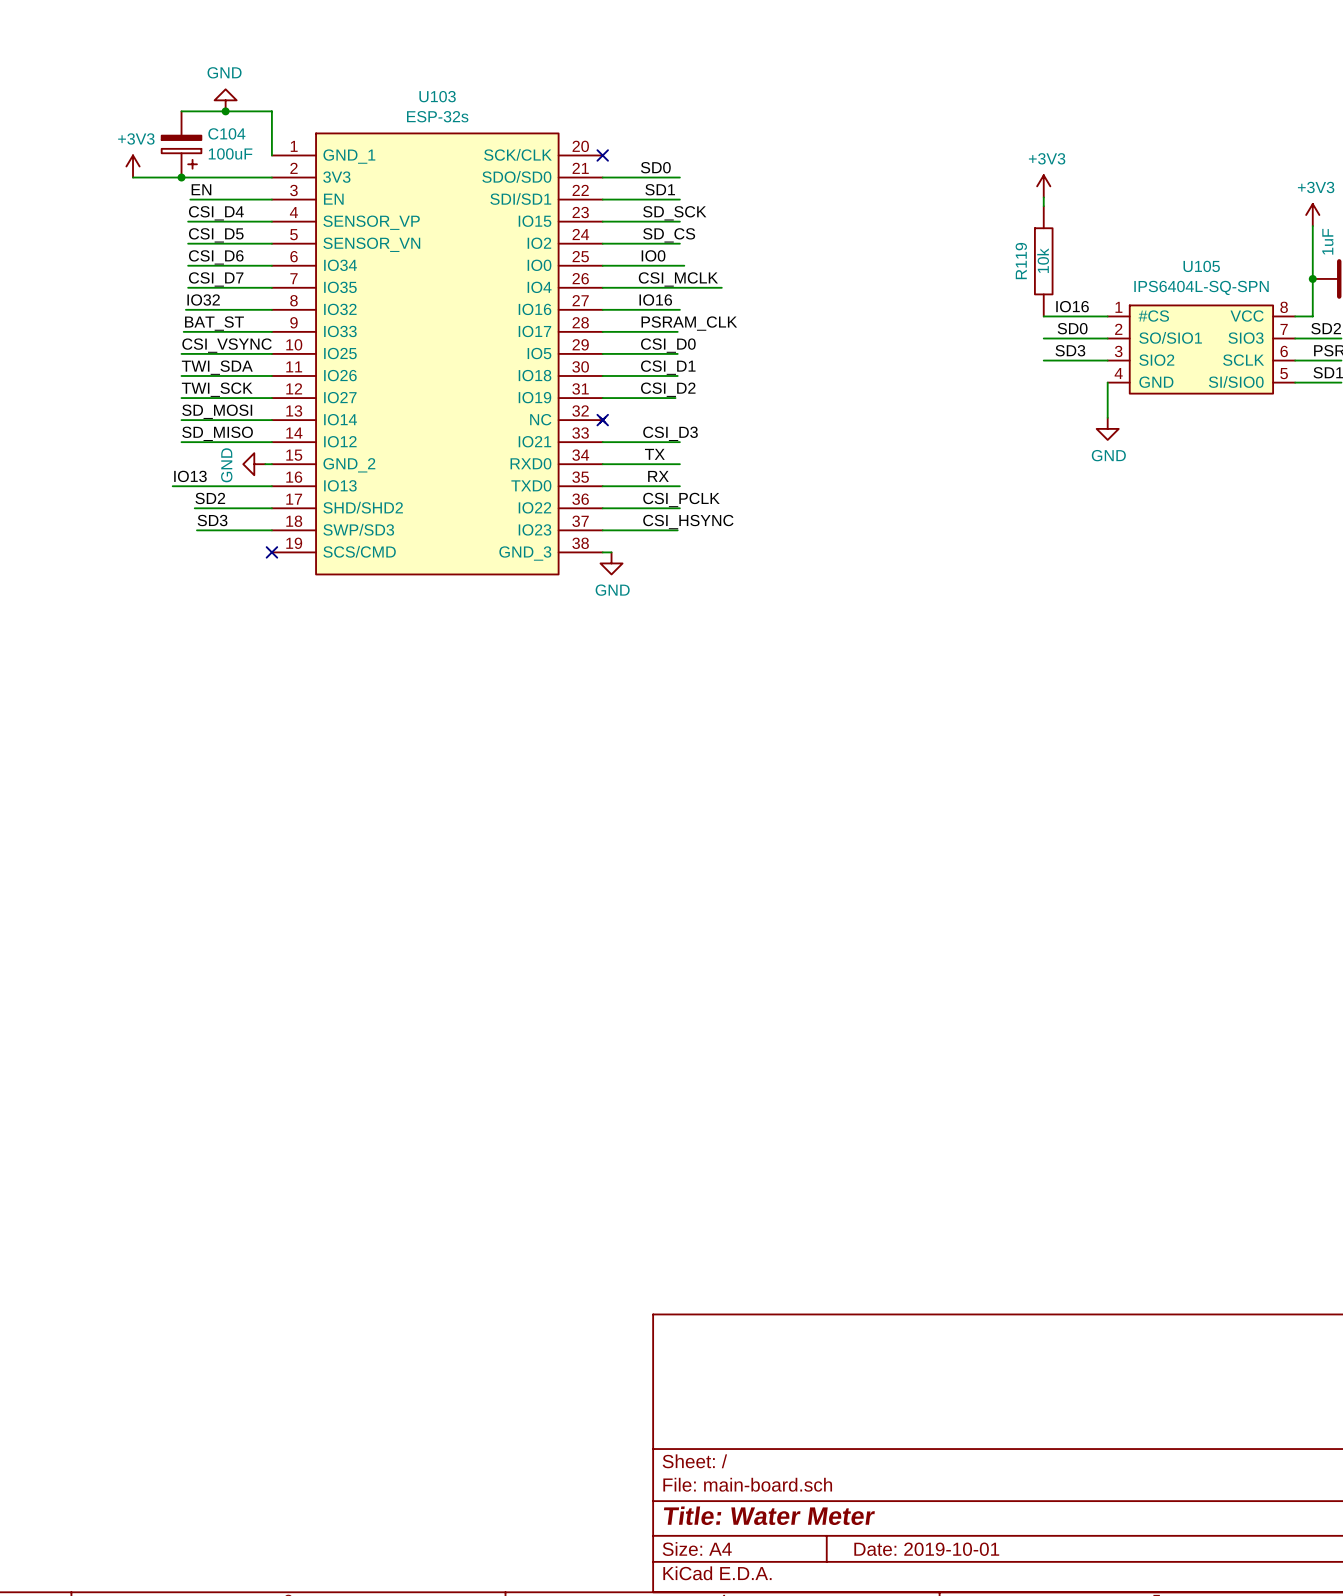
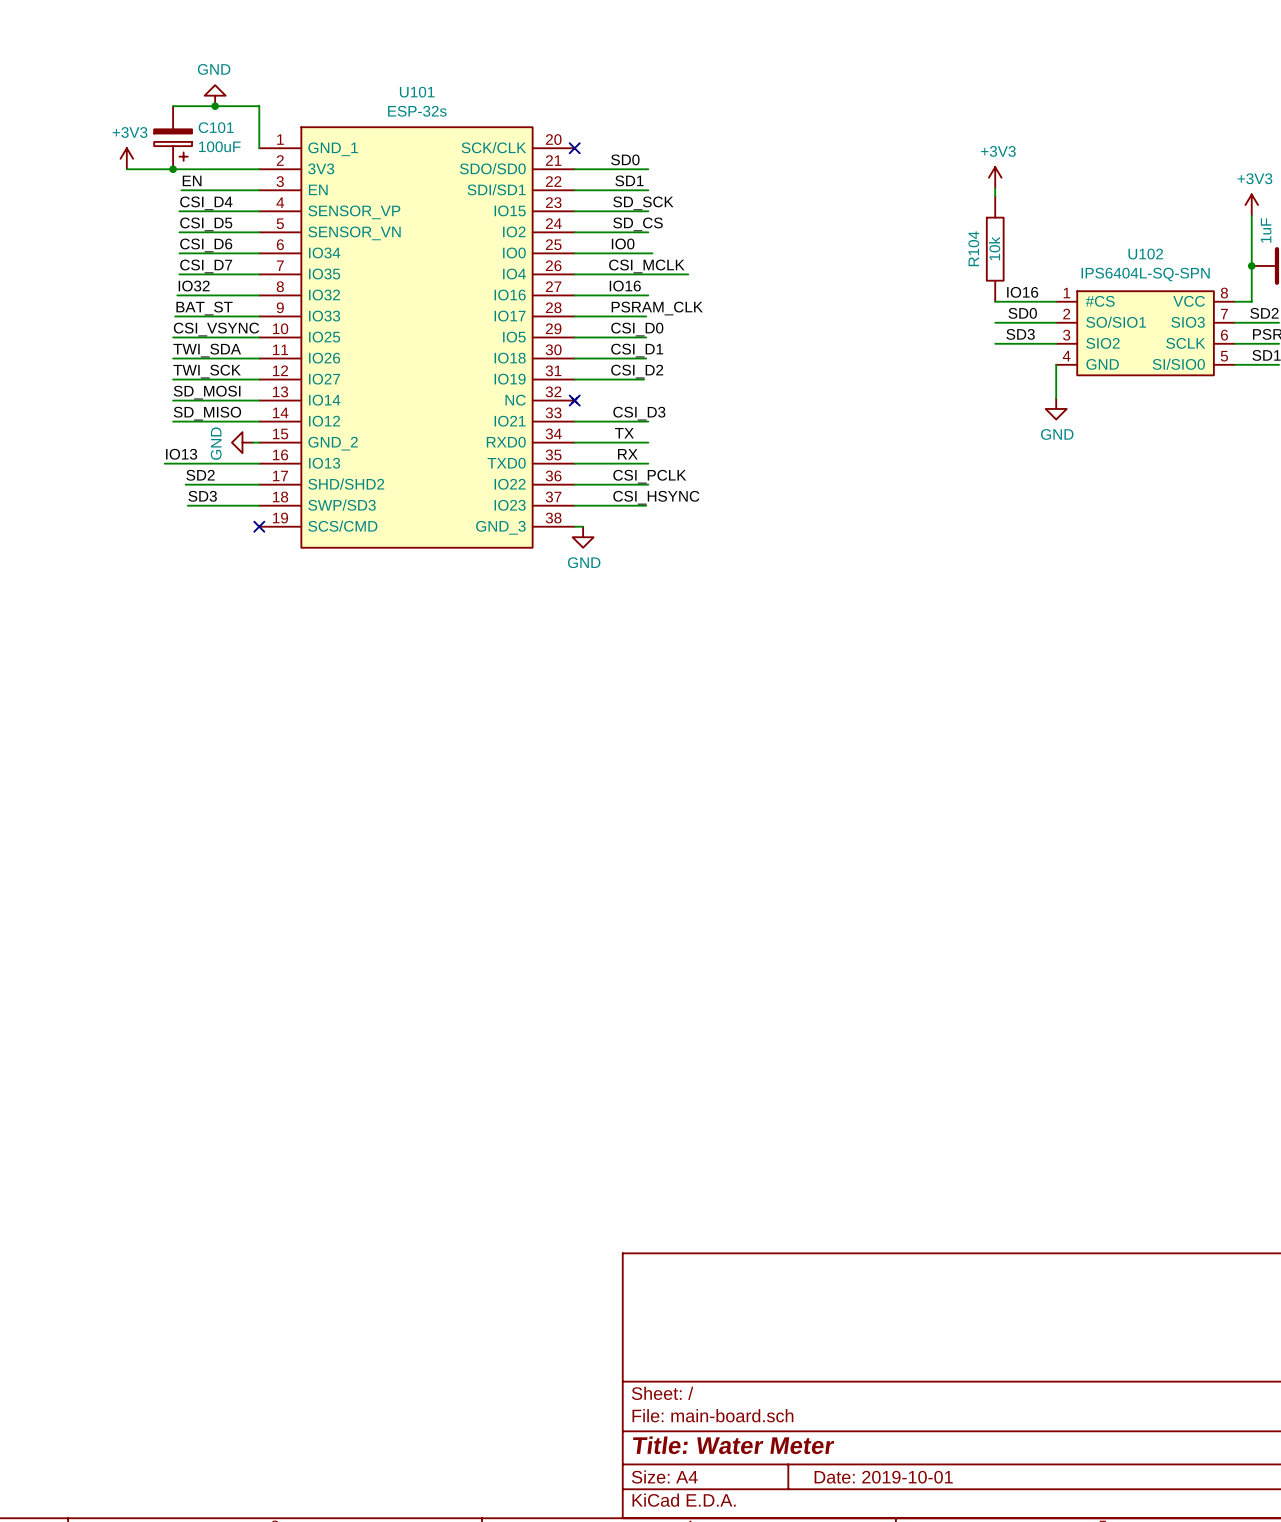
U103 name: U103 (437, 96) -> U101 (417, 92)
C104 name: C104 (226, 133) -> C101 (216, 127)
R119 name: R119 (1021, 261) -> R104 (973, 248)
U105 name: U105 (1201, 266) -> U102 (1145, 254)

